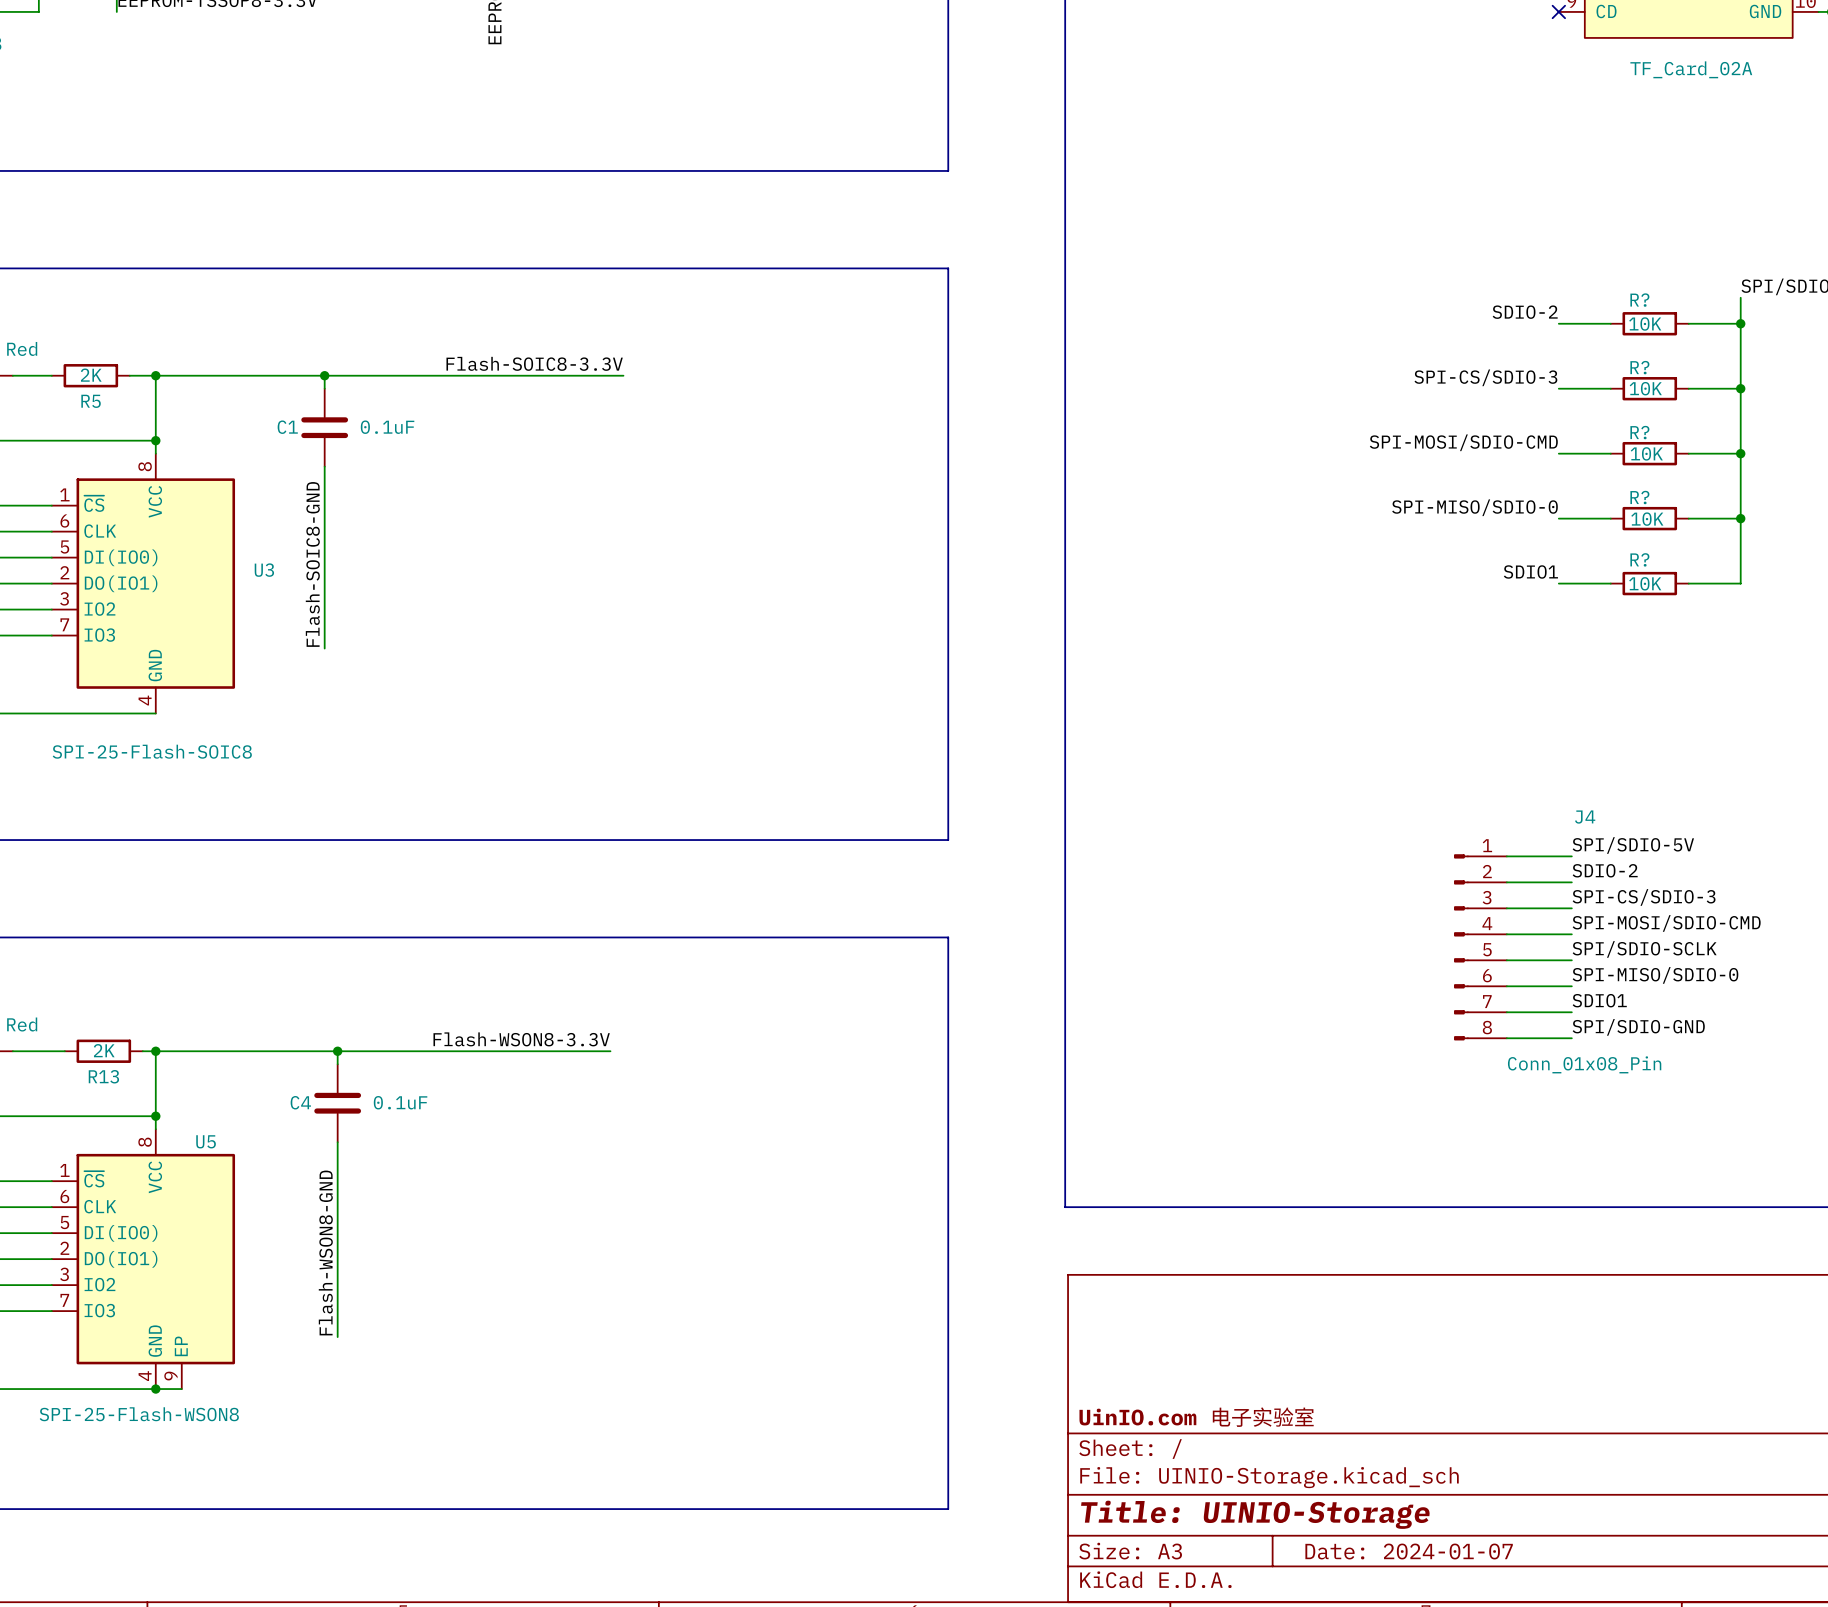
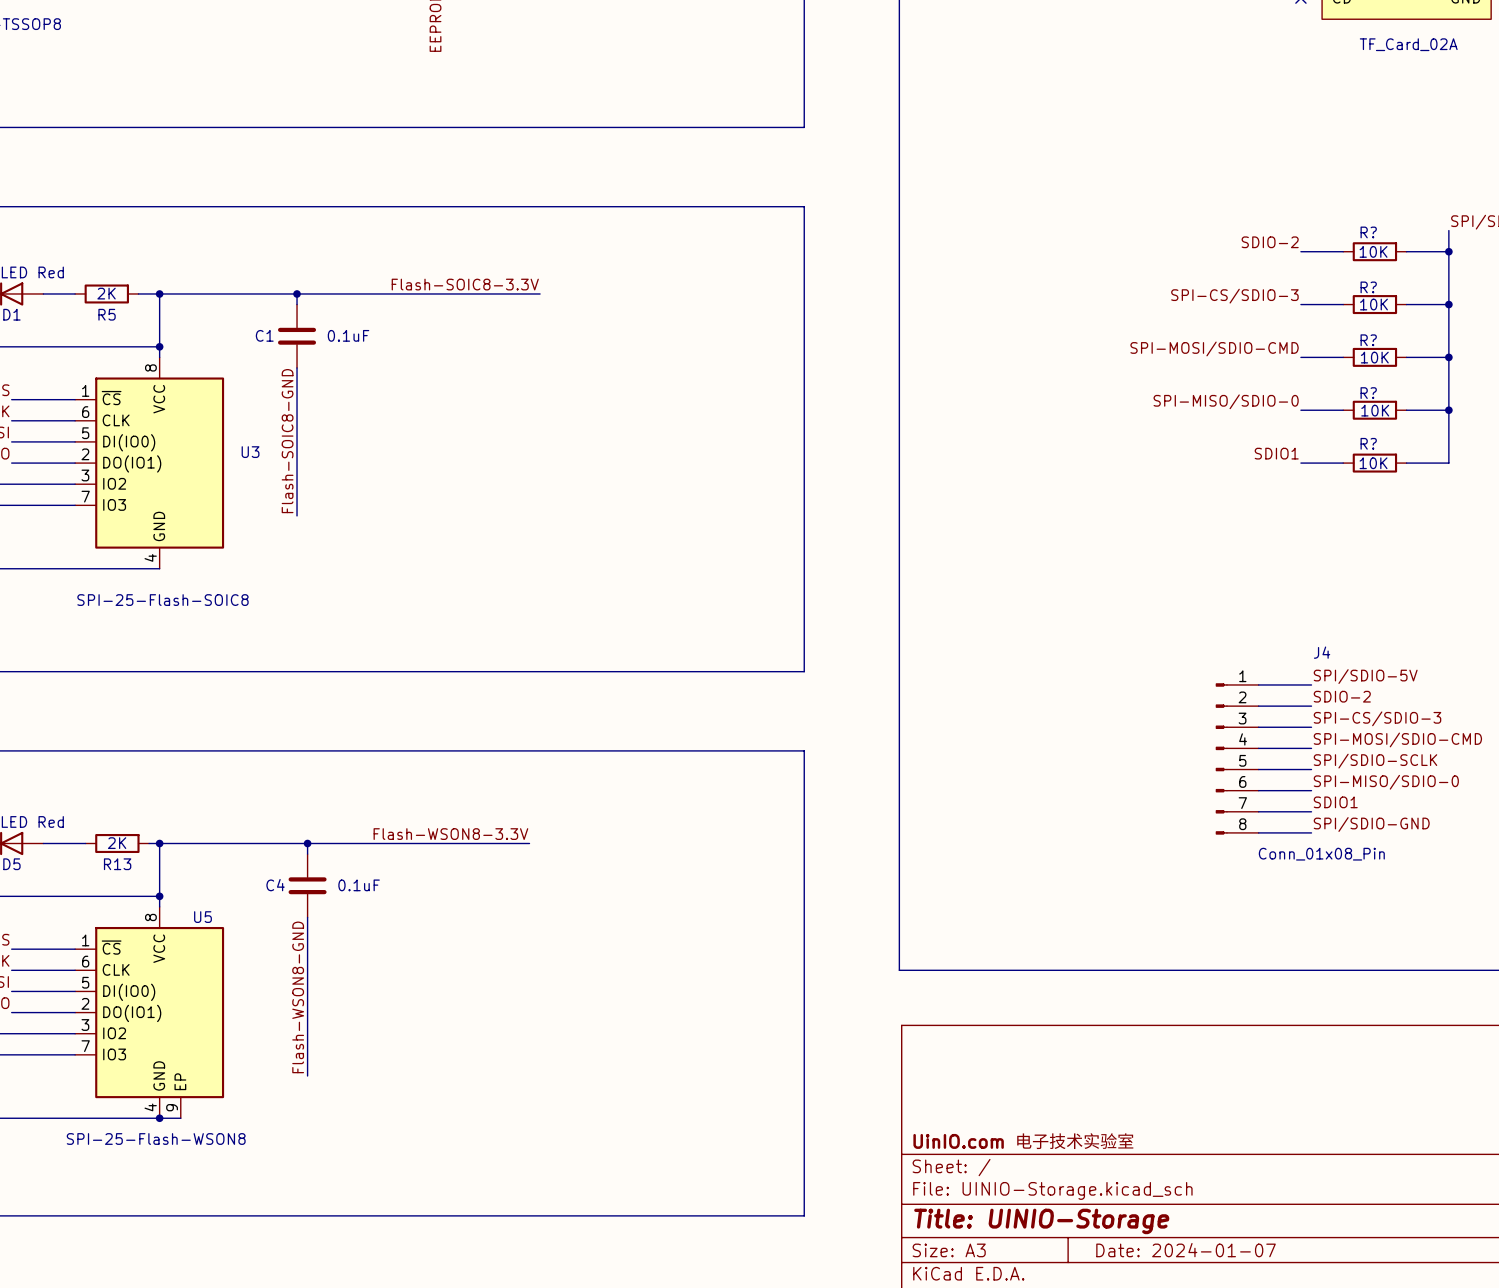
title block: UinIO.com 电子实验室 (1196, 1417) -> UinIO.com 电子技术实验室 (1023, 1141)

